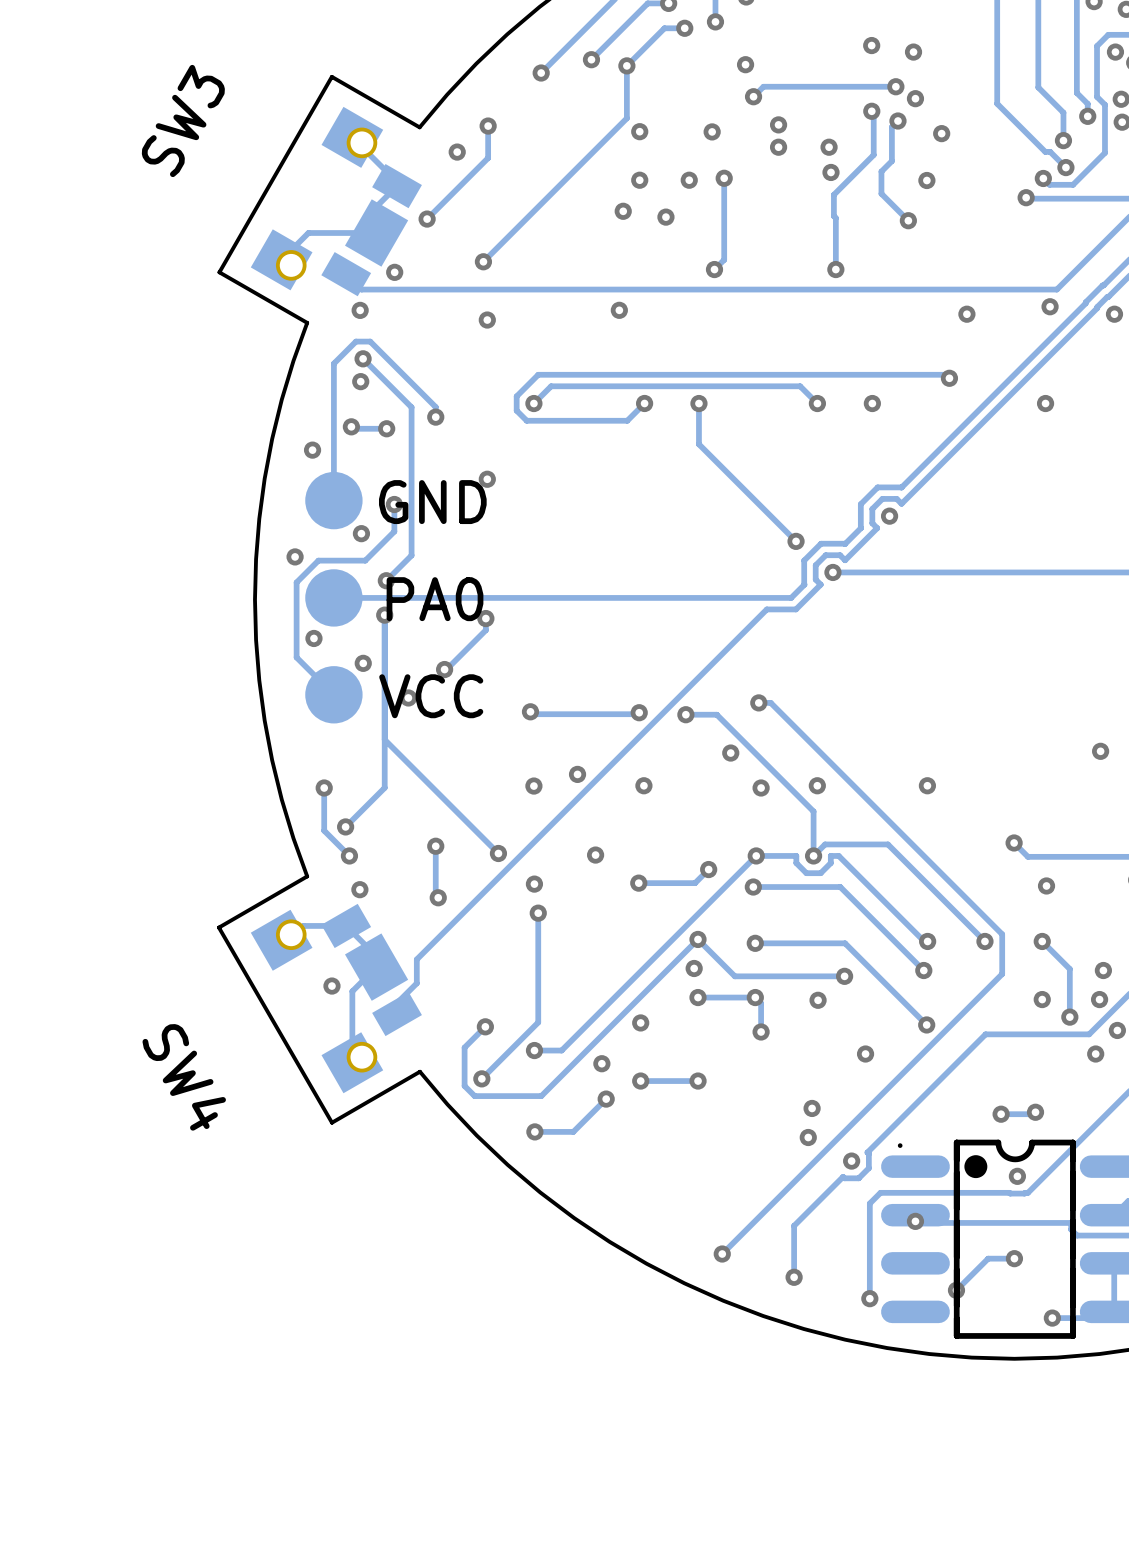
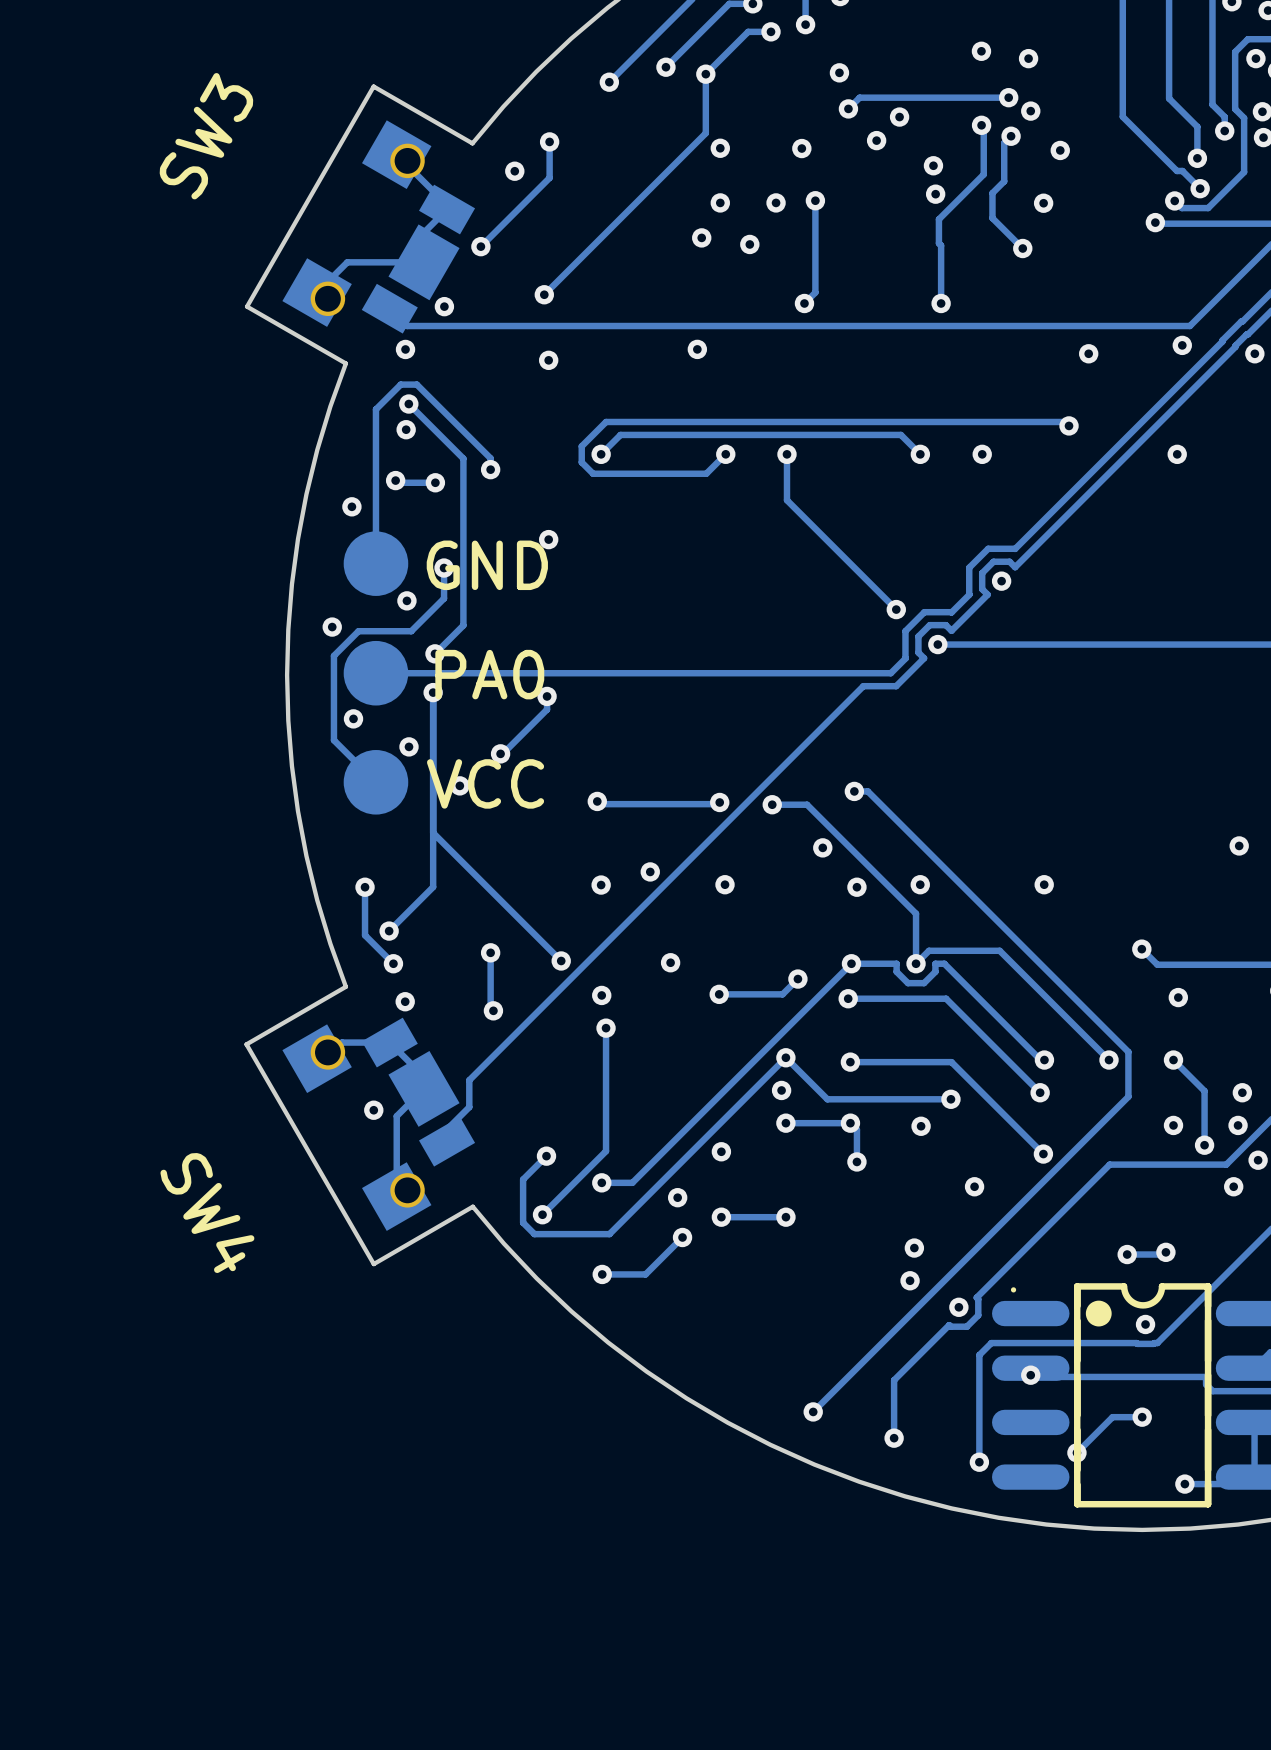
via position: (778, 147) -> (899, 117)

